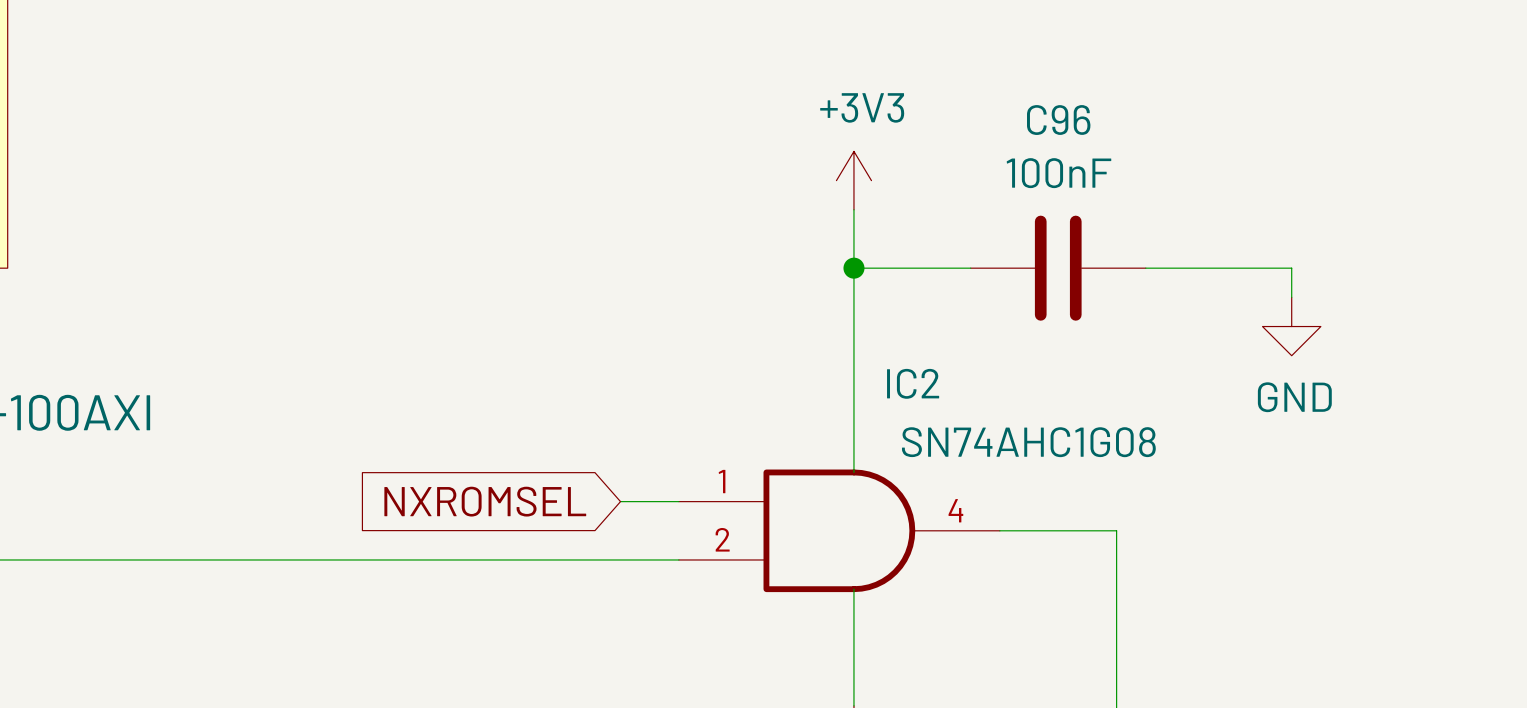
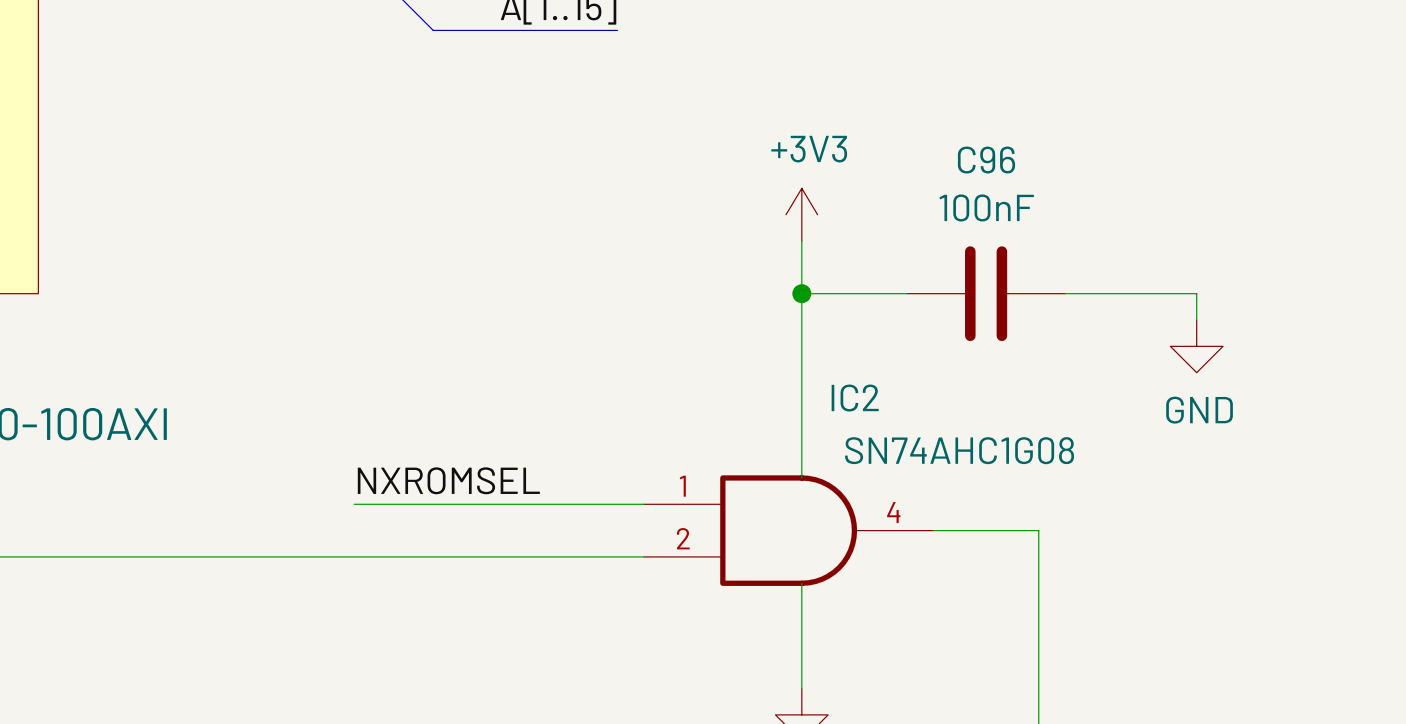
label: none -> NXROMSEL (448, 480)
wire: none -> (354, 504) (591, 504)
global label: NXROMSEL (485, 501) -> none

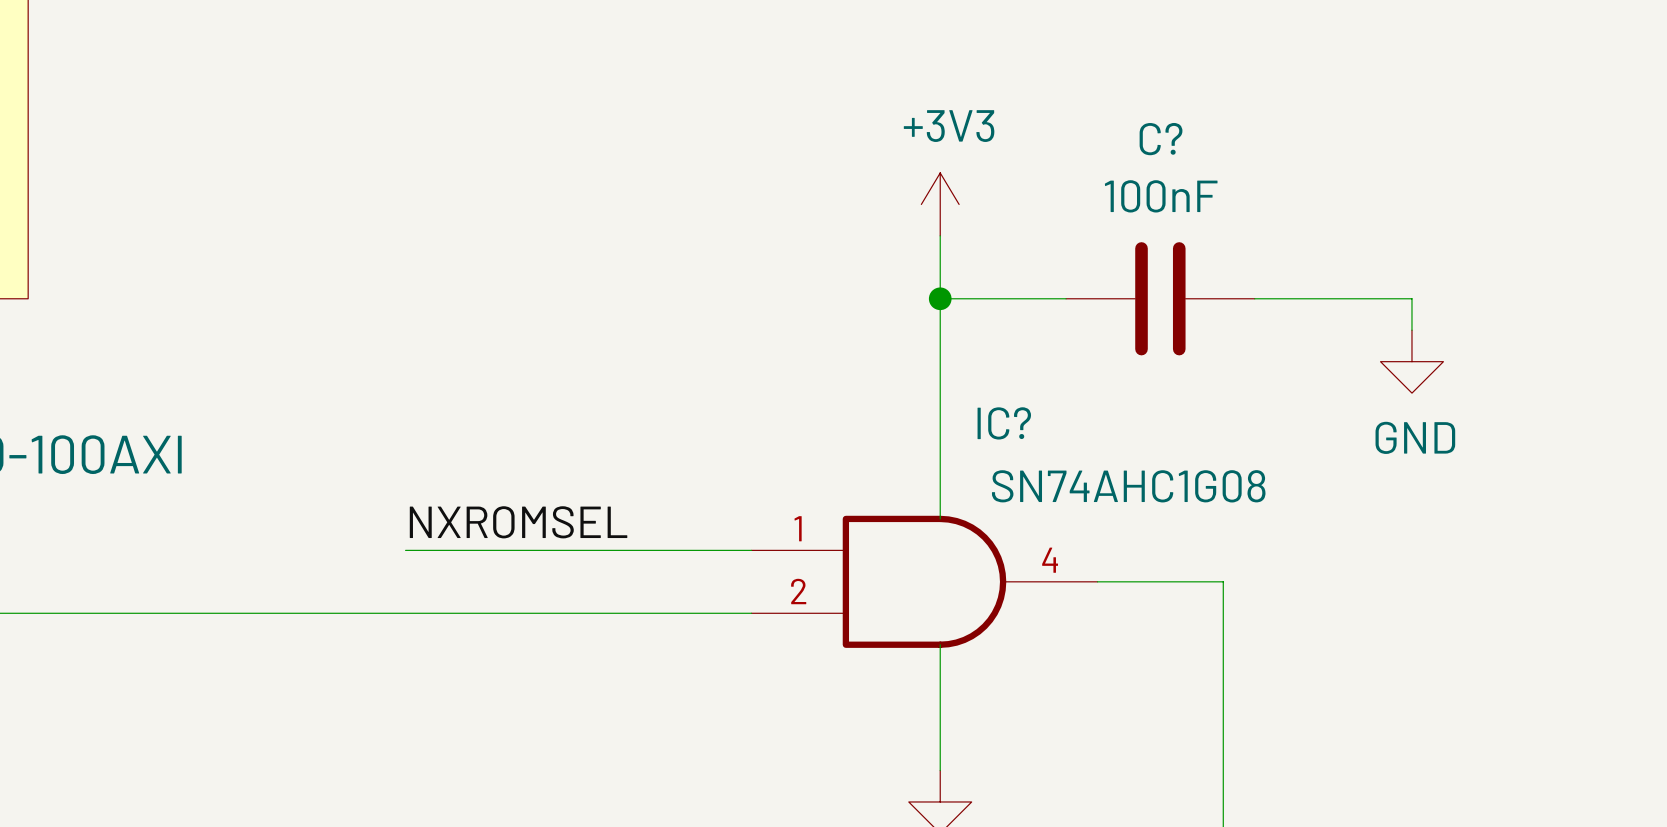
C96 name: C96 (986, 160) -> C? (1161, 139)
IC2 name: IC2 (855, 398) -> IC? (1004, 423)

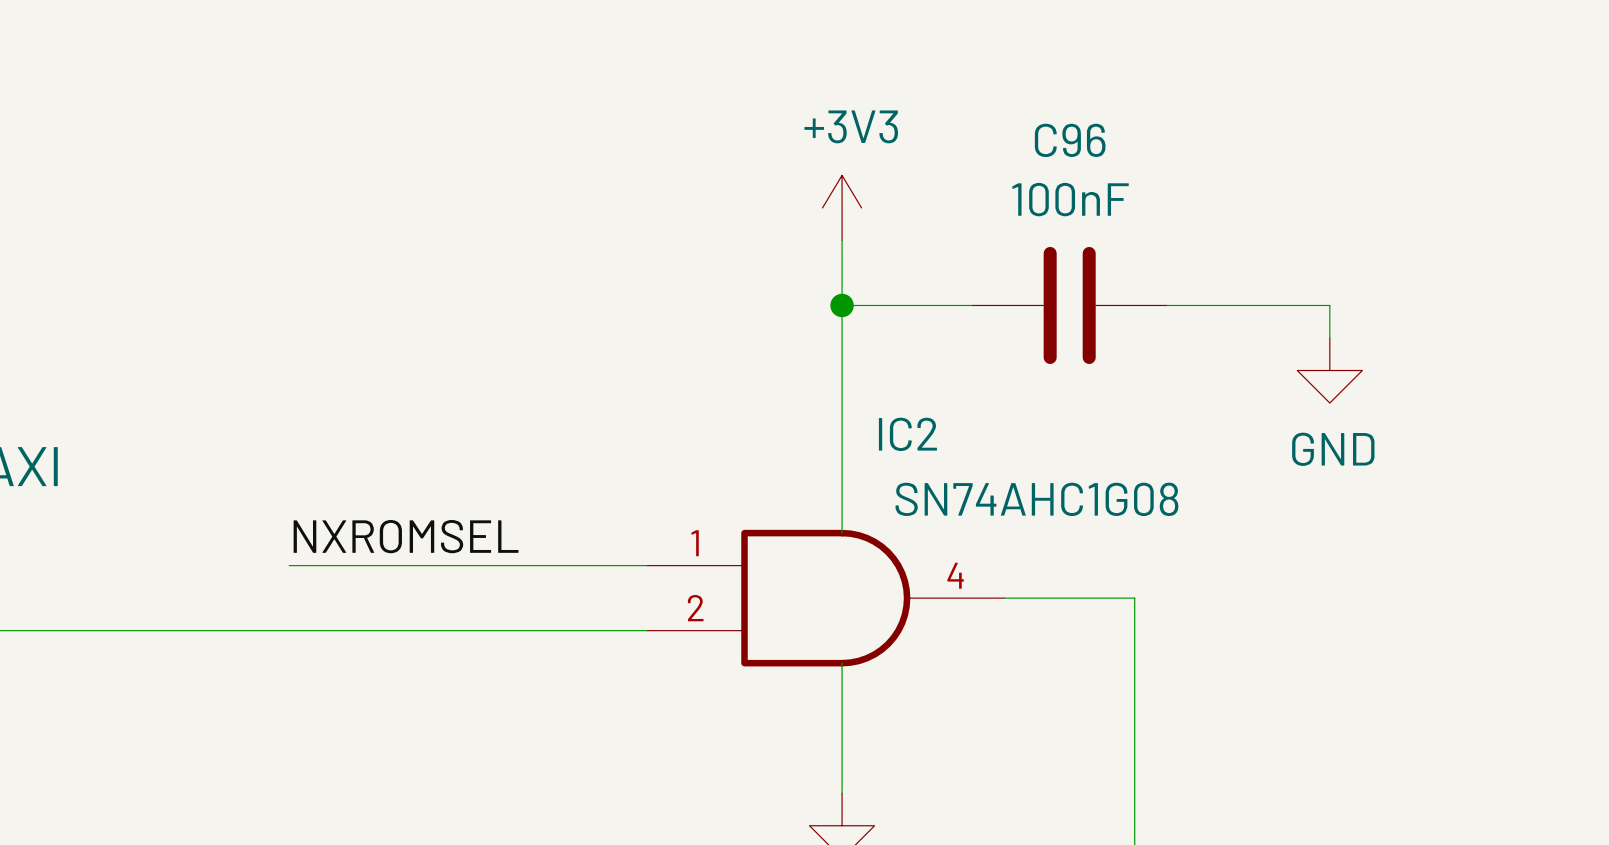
C? name: C? (1161, 139) -> C96 (1070, 140)
IC? name: IC? (1004, 423) -> IC2 (907, 434)

